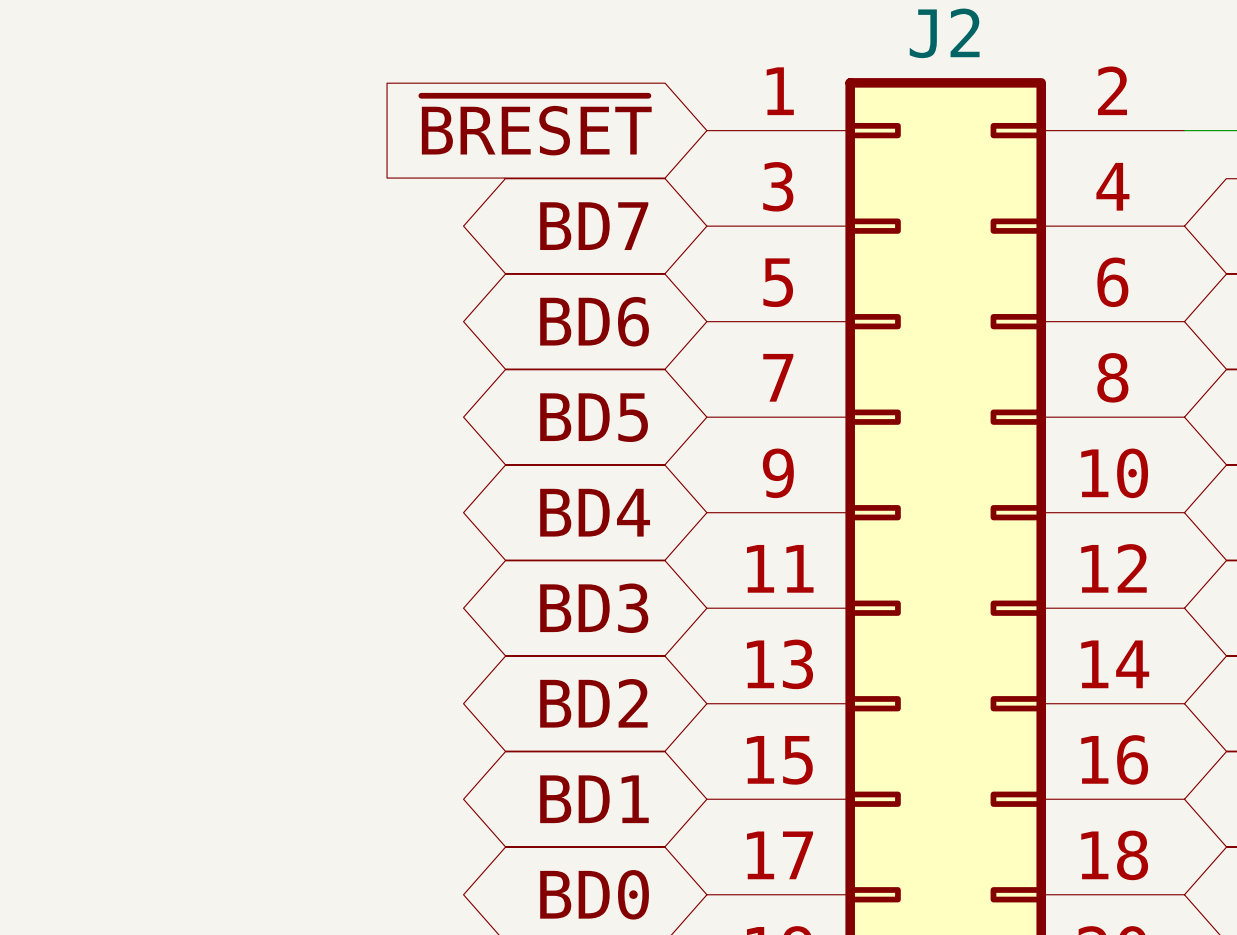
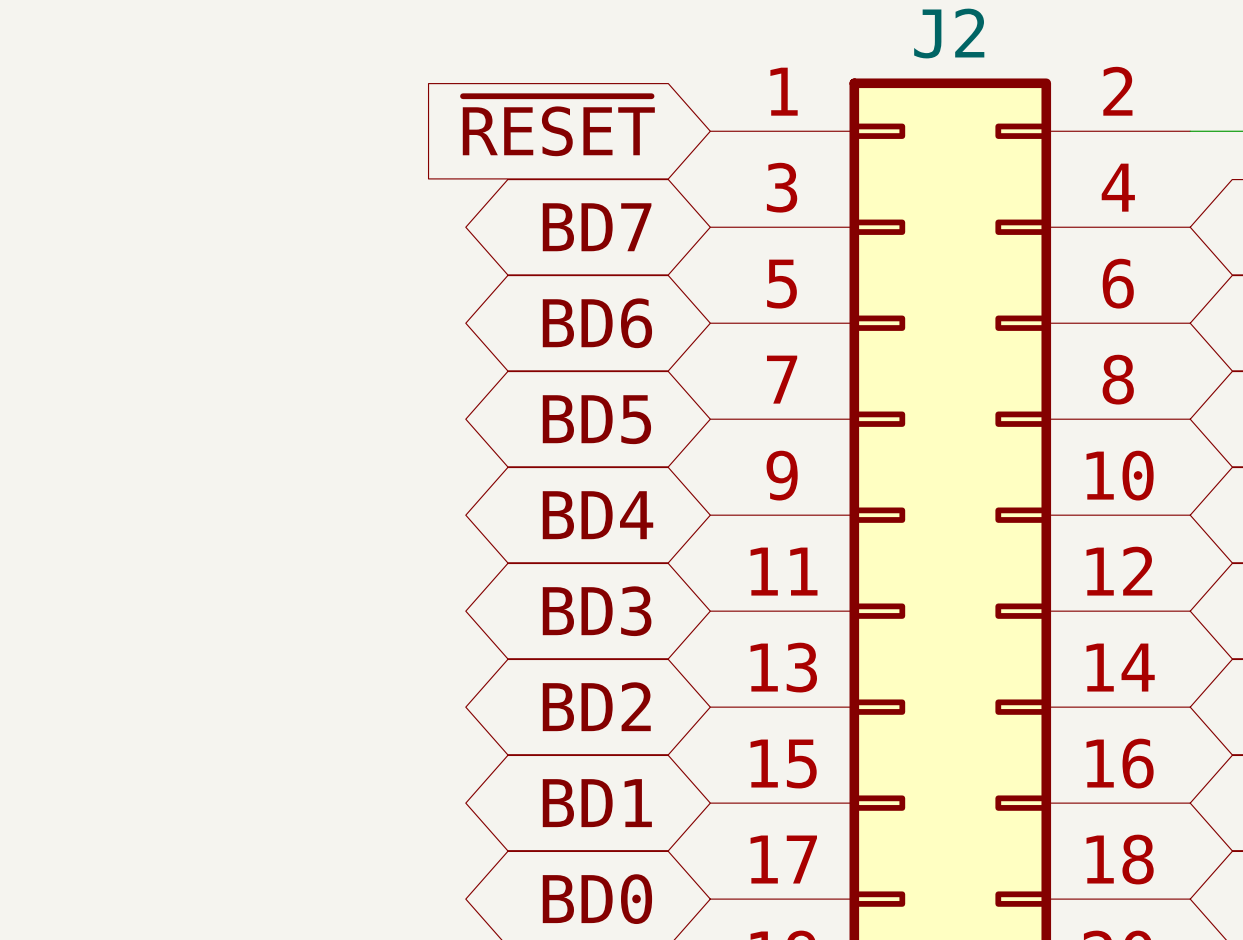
global label: ~{BRESET} (536, 125) -> ~{RESET} (558, 126)

